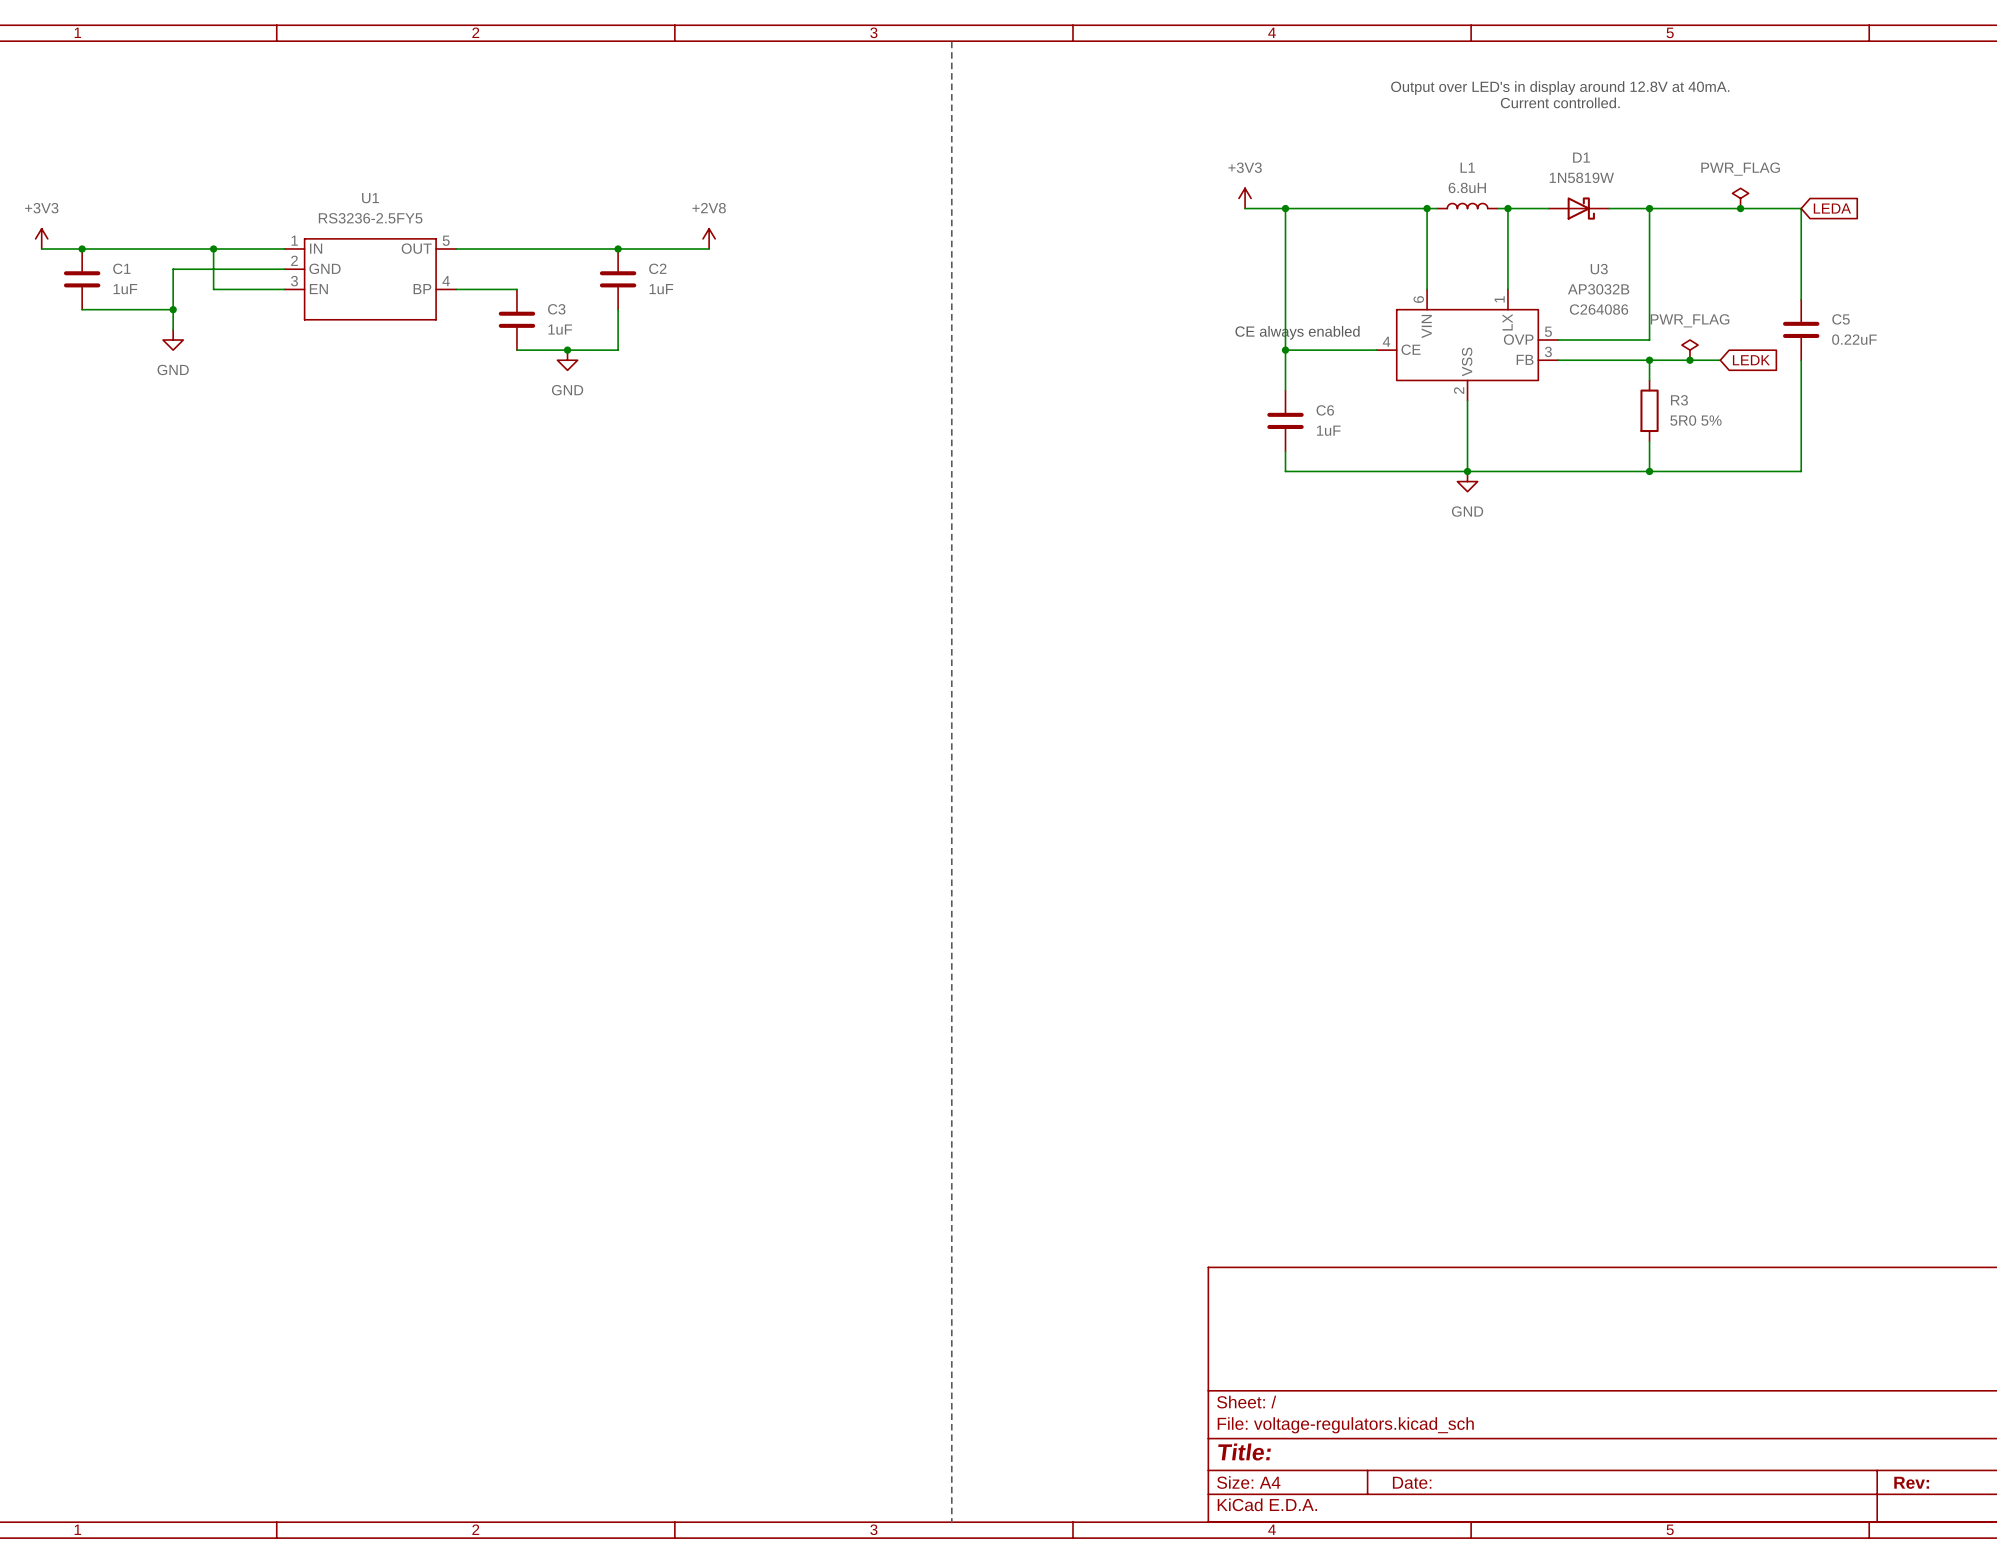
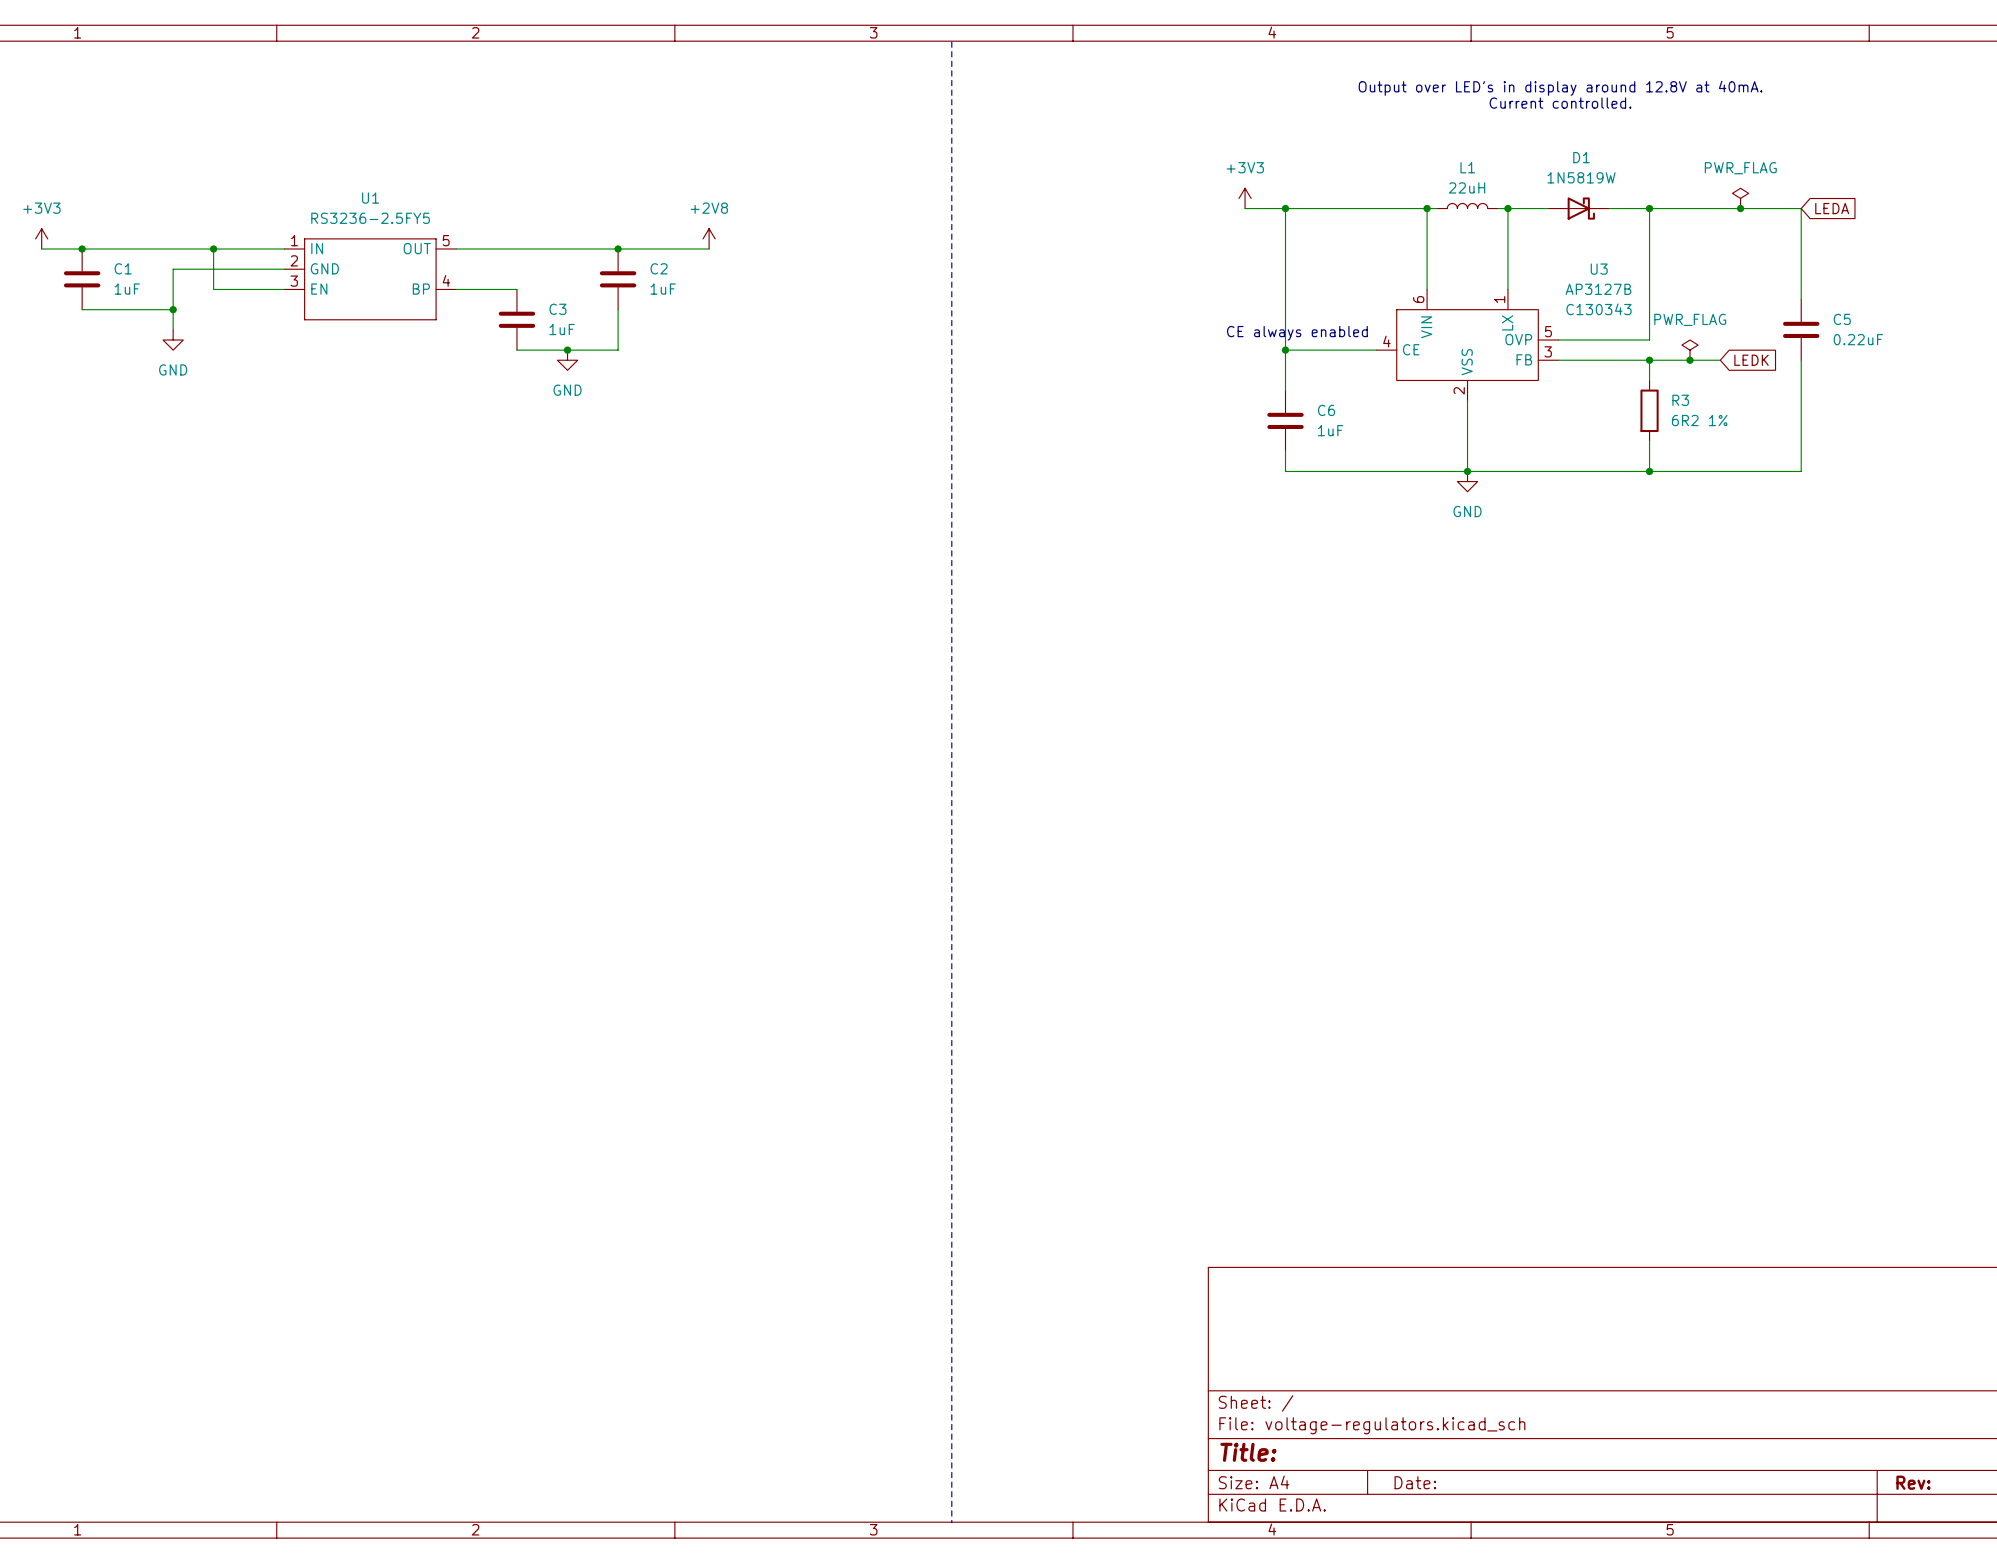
L1 value: 6.8uH (1467, 187) -> 22uH (1467, 187)
U3 value: AP3032B (1598, 289) -> AP3127B (1598, 289)
U3 text: C264086 (1599, 309) -> C130343 (1598, 309)
R3 value: 5R0 5% (1695, 420) -> 6R2 1% (1699, 420)

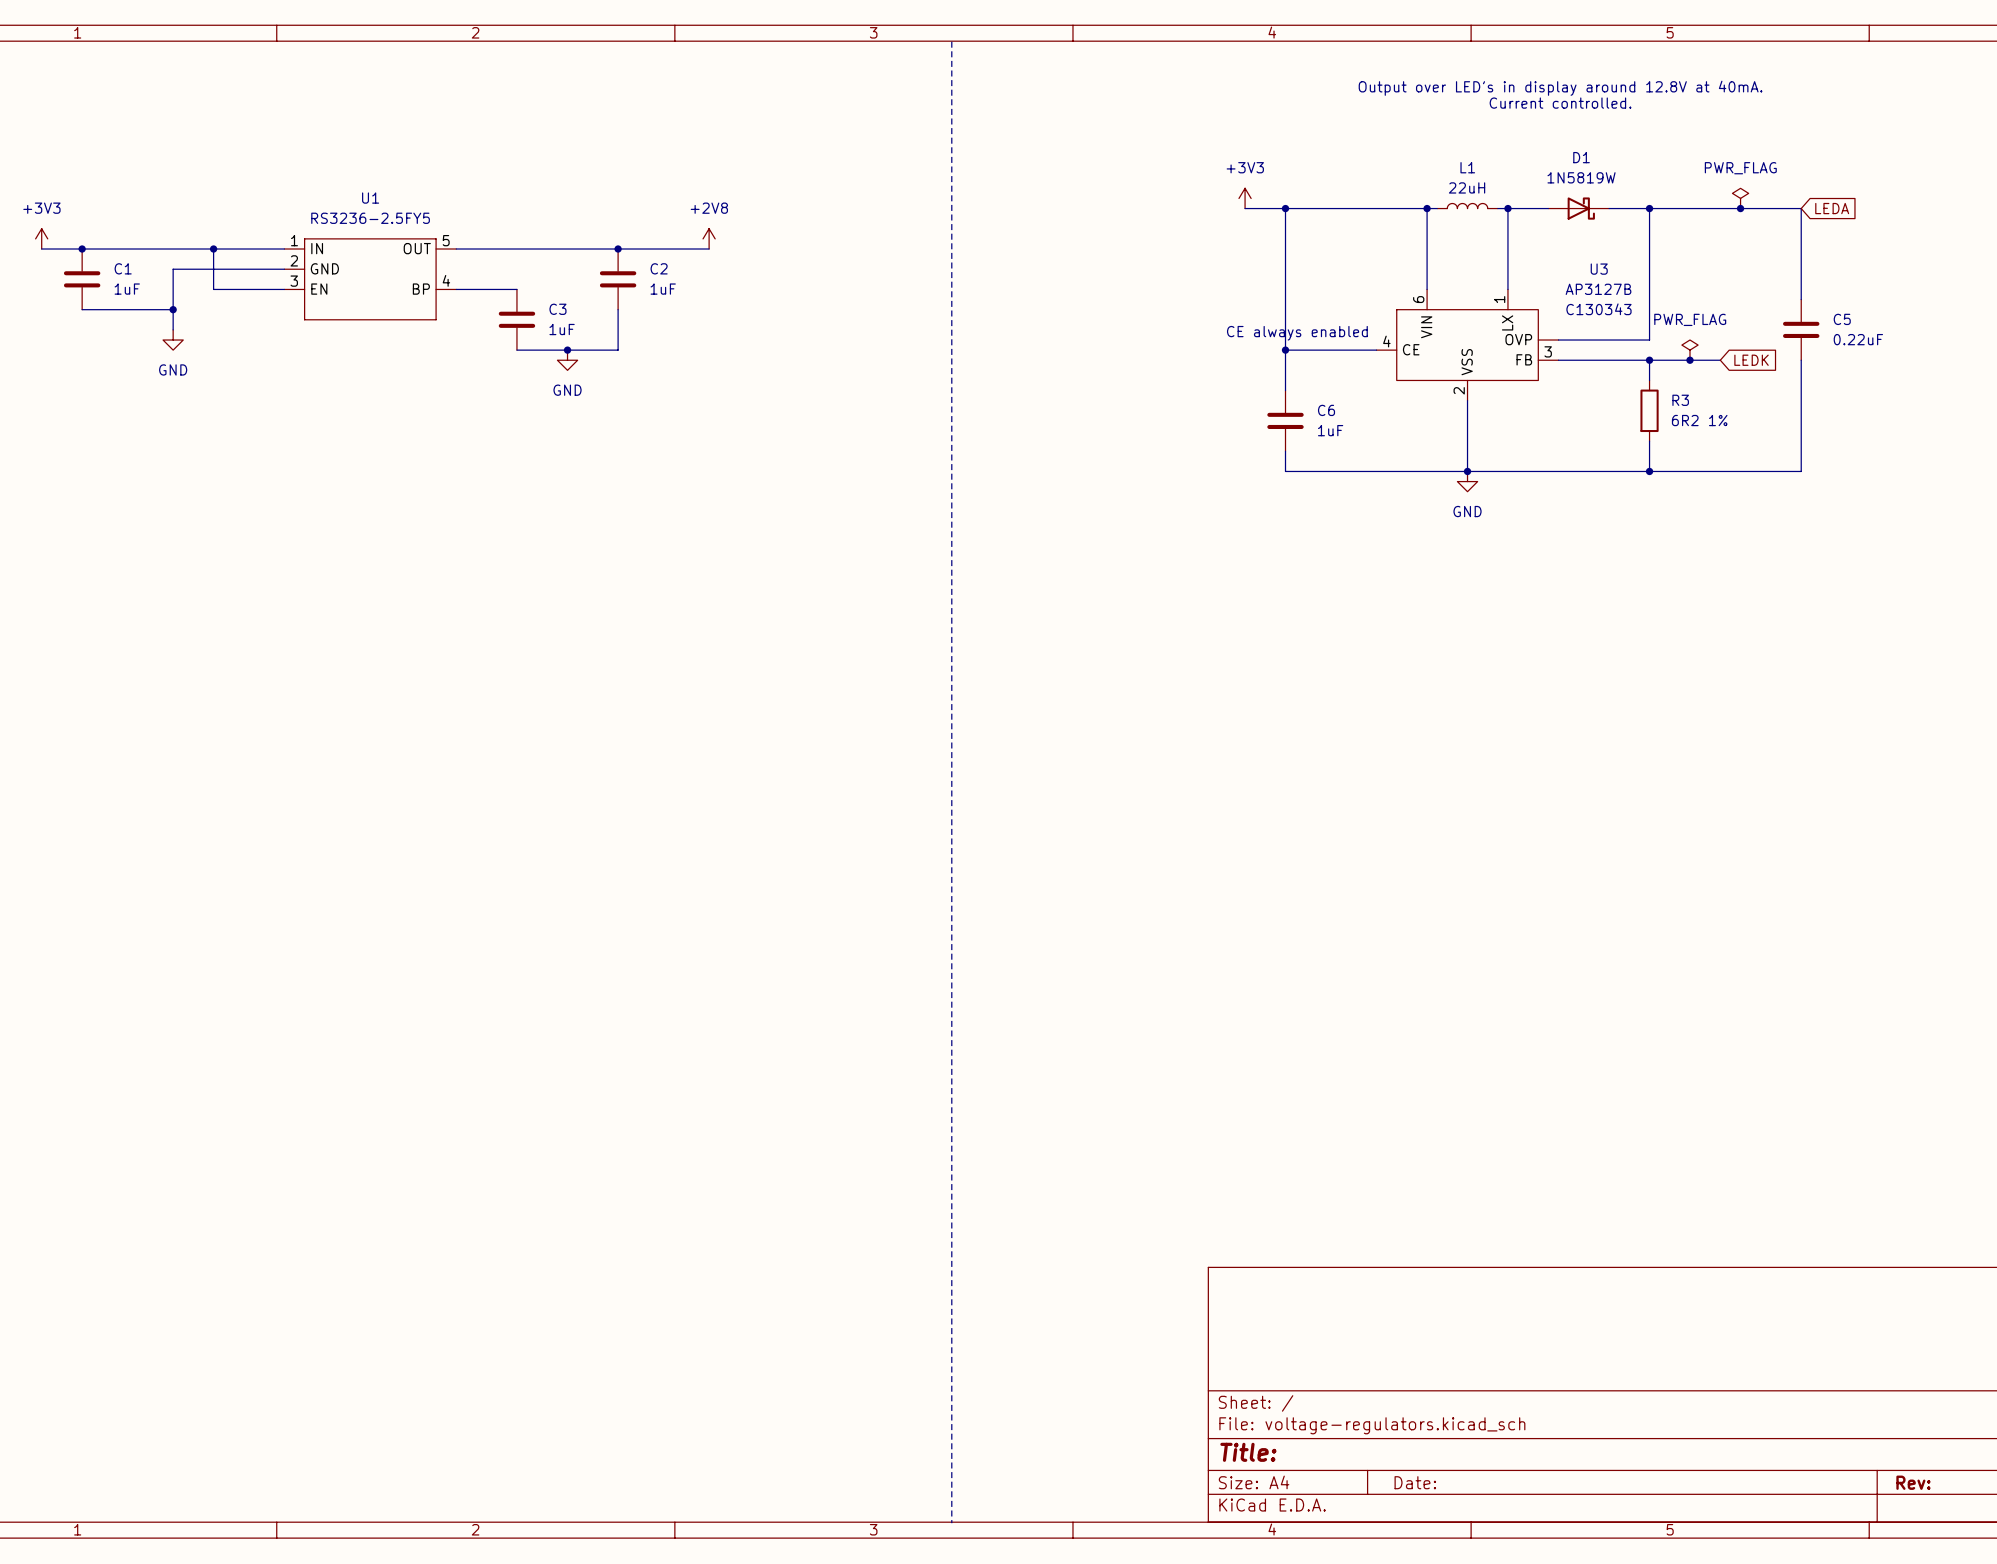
U3 pin number: 5 (1548, 331) -> none

